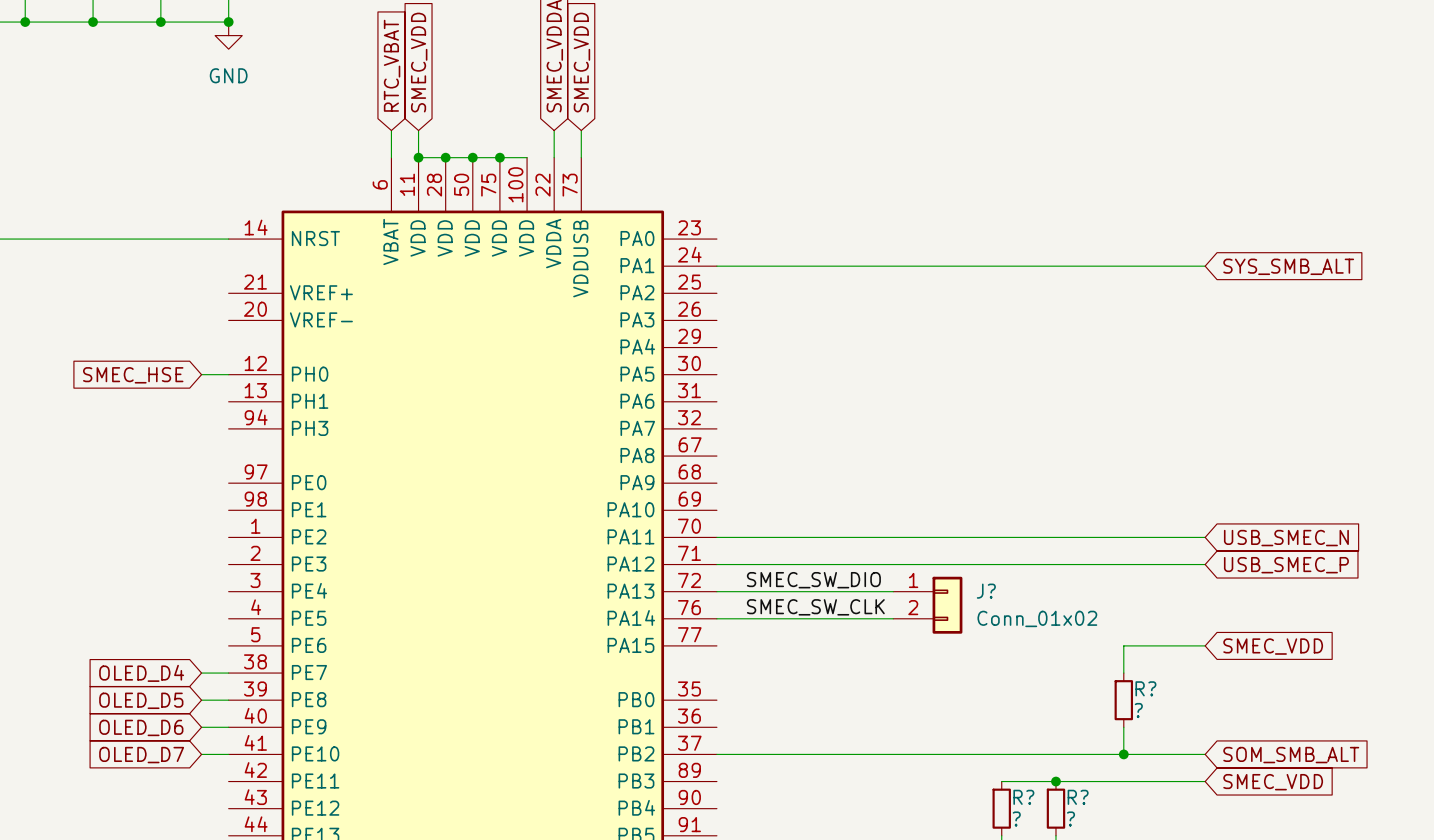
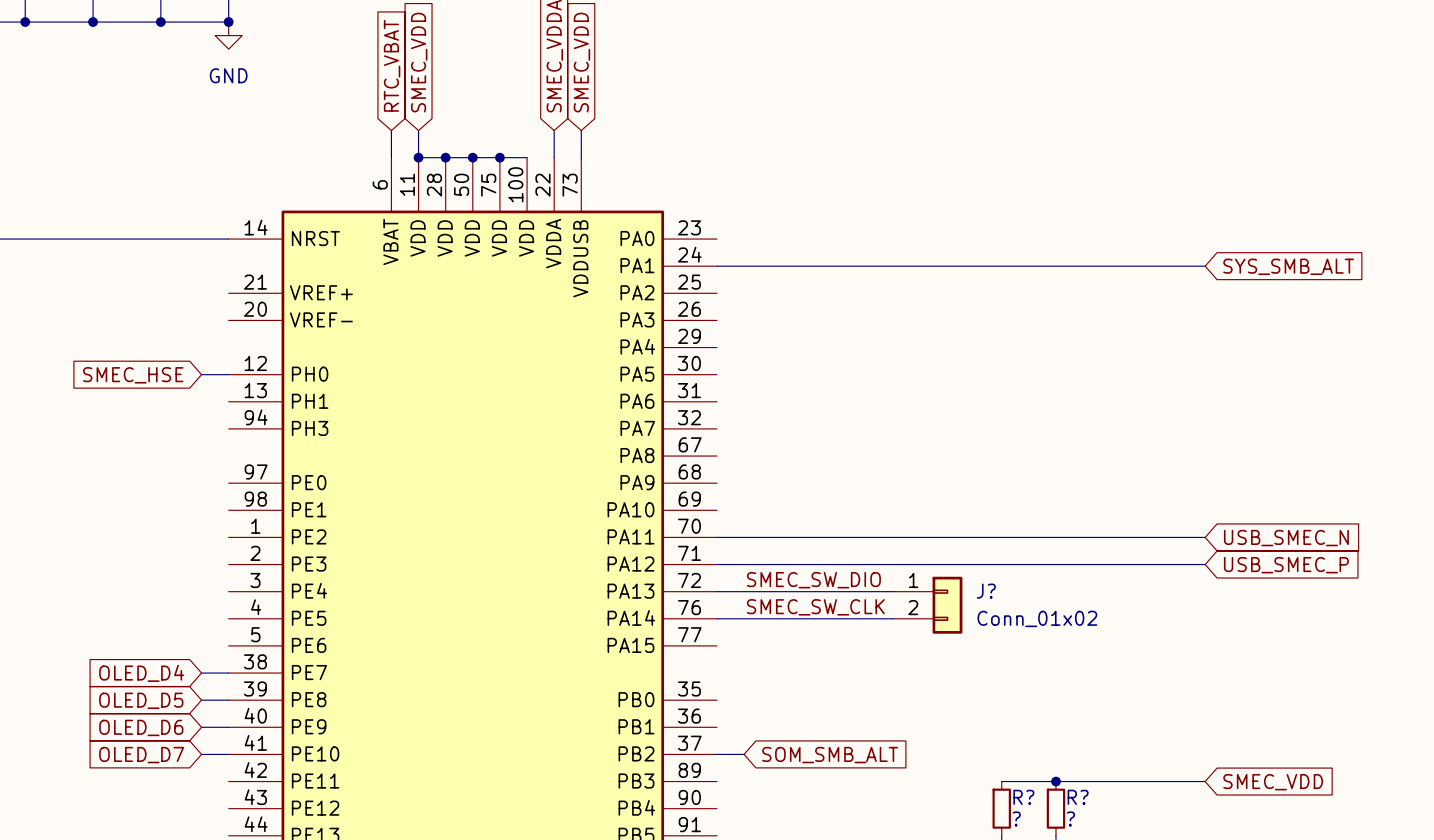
wire: (1205, 645) (1123, 645) (1123, 673) -> none
global label: SMEC_VDD (1273, 646) -> none
R?: ? (1123, 700) -> none
wire: (1123, 727) (1123, 754) -> none
wire: (744, 754) (1205, 754) -> none
junction: (1123, 754) -> none
global label: none -> SOM_SMB_ALT (830, 755)
global label: SOM_SMB_ALT (1291, 755) -> none

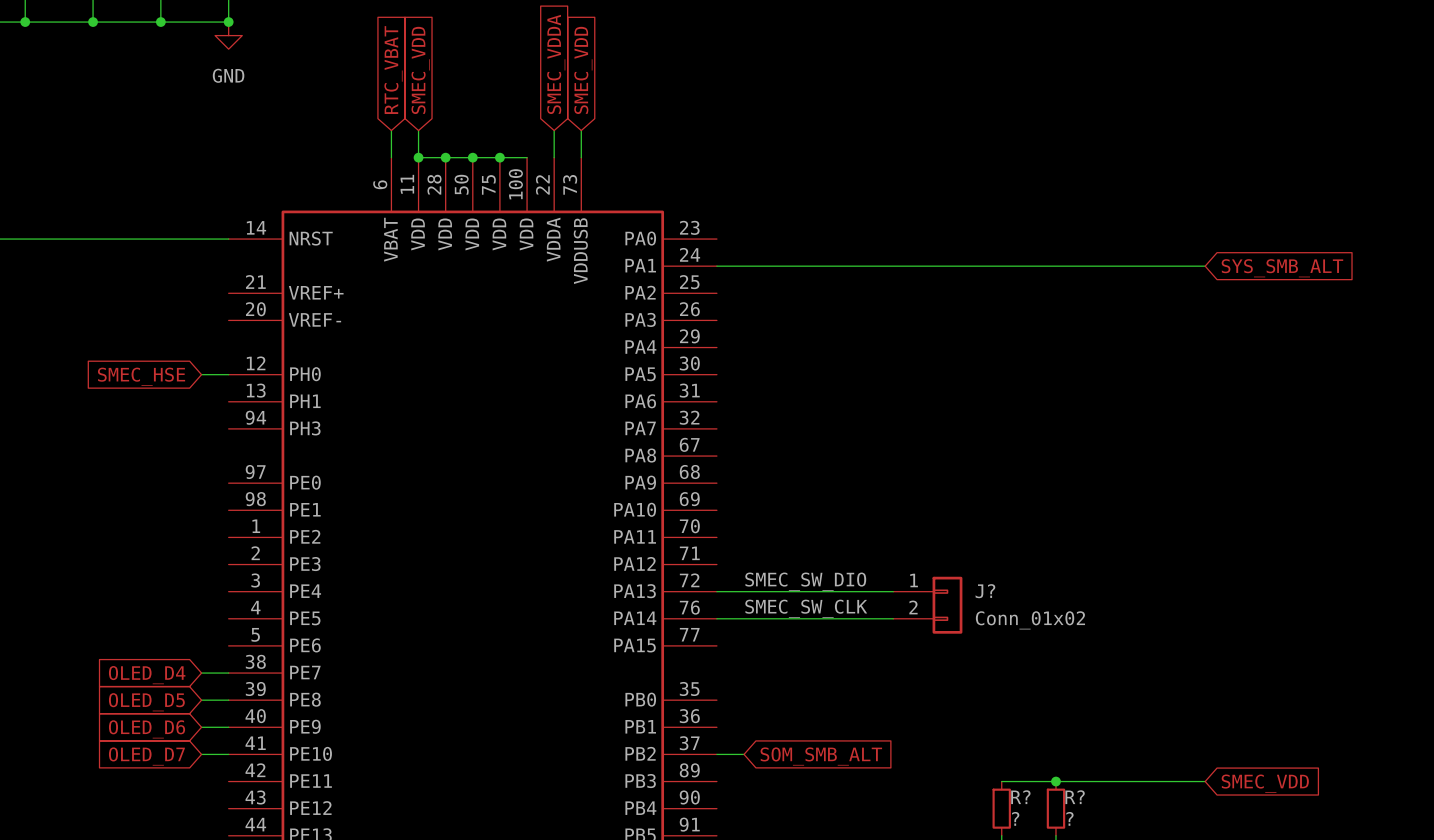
wire: (716, 537) (1205, 537) -> none
global label: USB_SMEC_N (1286, 538) -> none
wire: (716, 564) (1205, 564) -> none
global label: USB_SMEC_P (1286, 565) -> none

